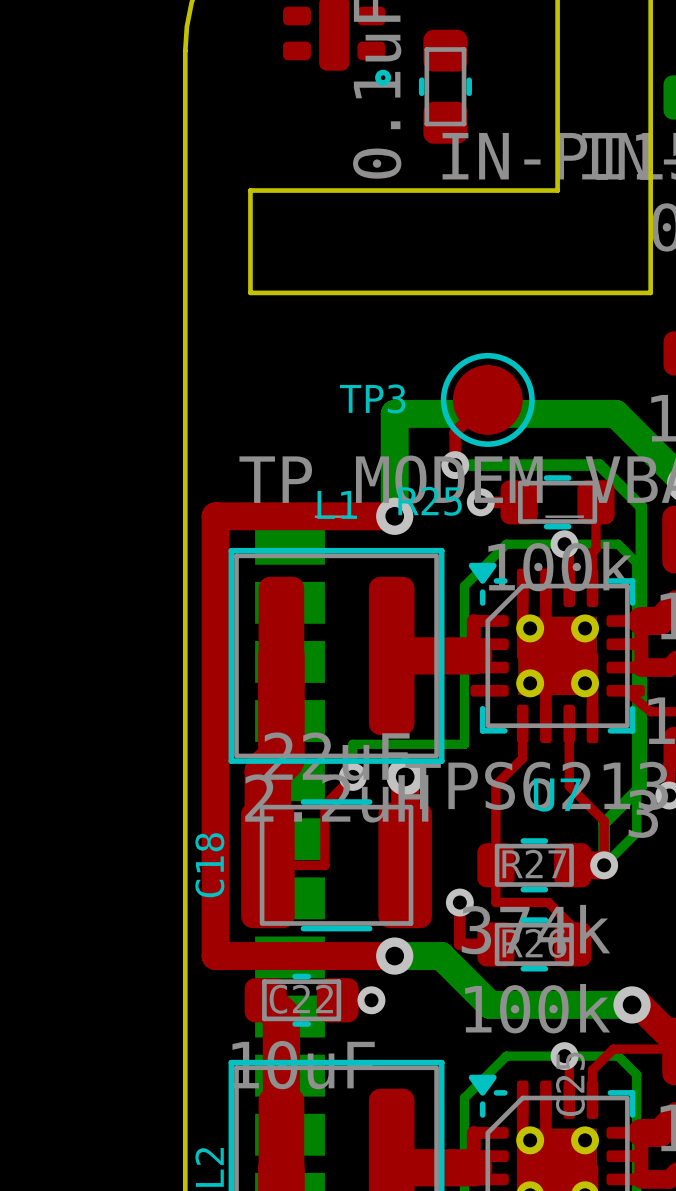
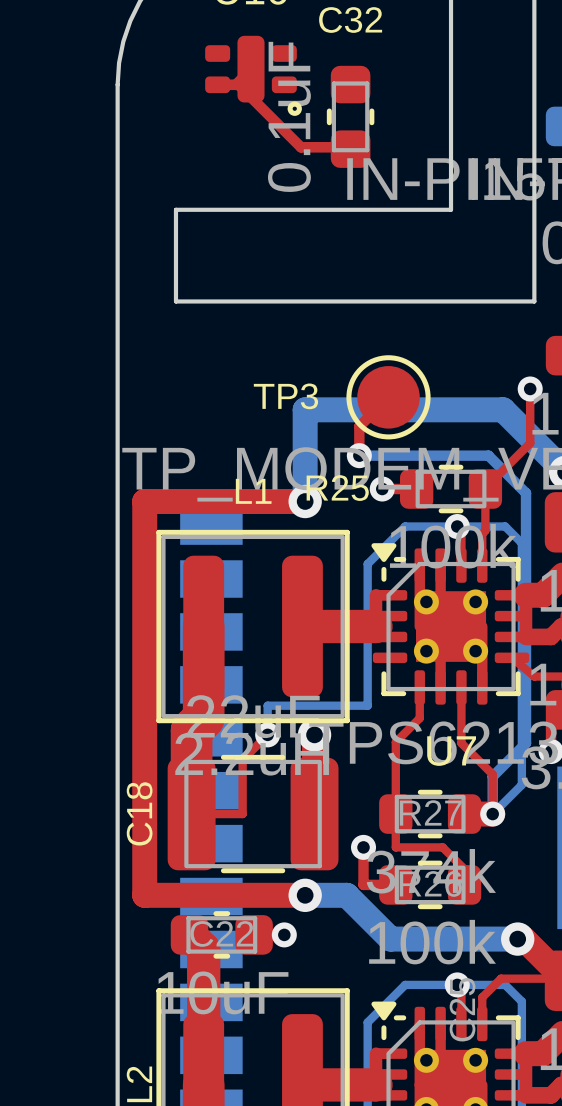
top track: none -> (250, 69) (250, 68) (234, 84) (217, 84) (238, 84) (301, 147) (351, 147) (350, 149)
top track: none -> (530, 388) (530, 443) (485, 489)
via: none -> (530, 388)

